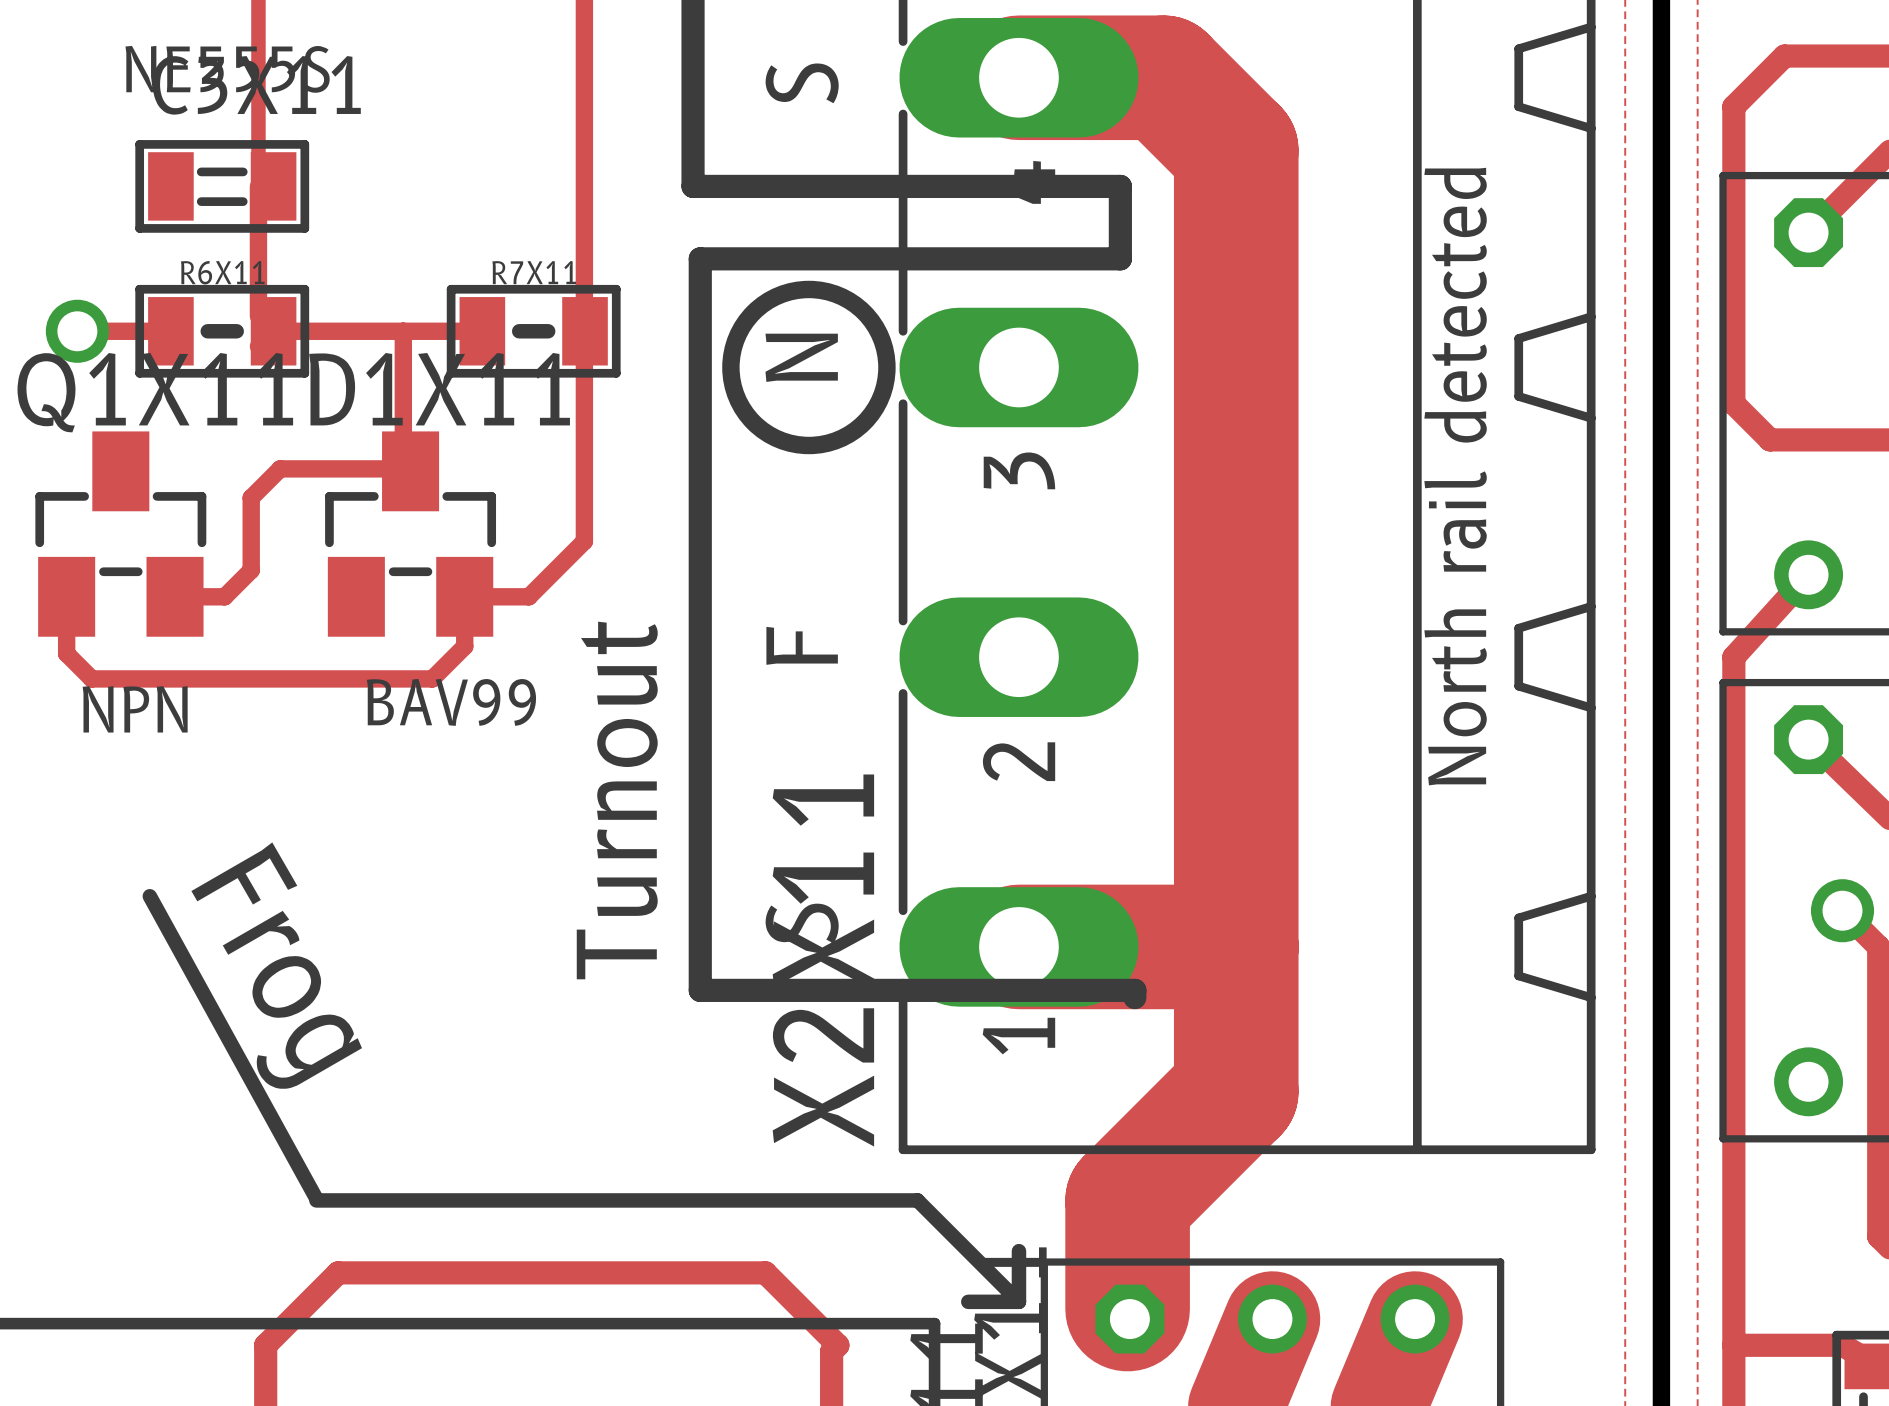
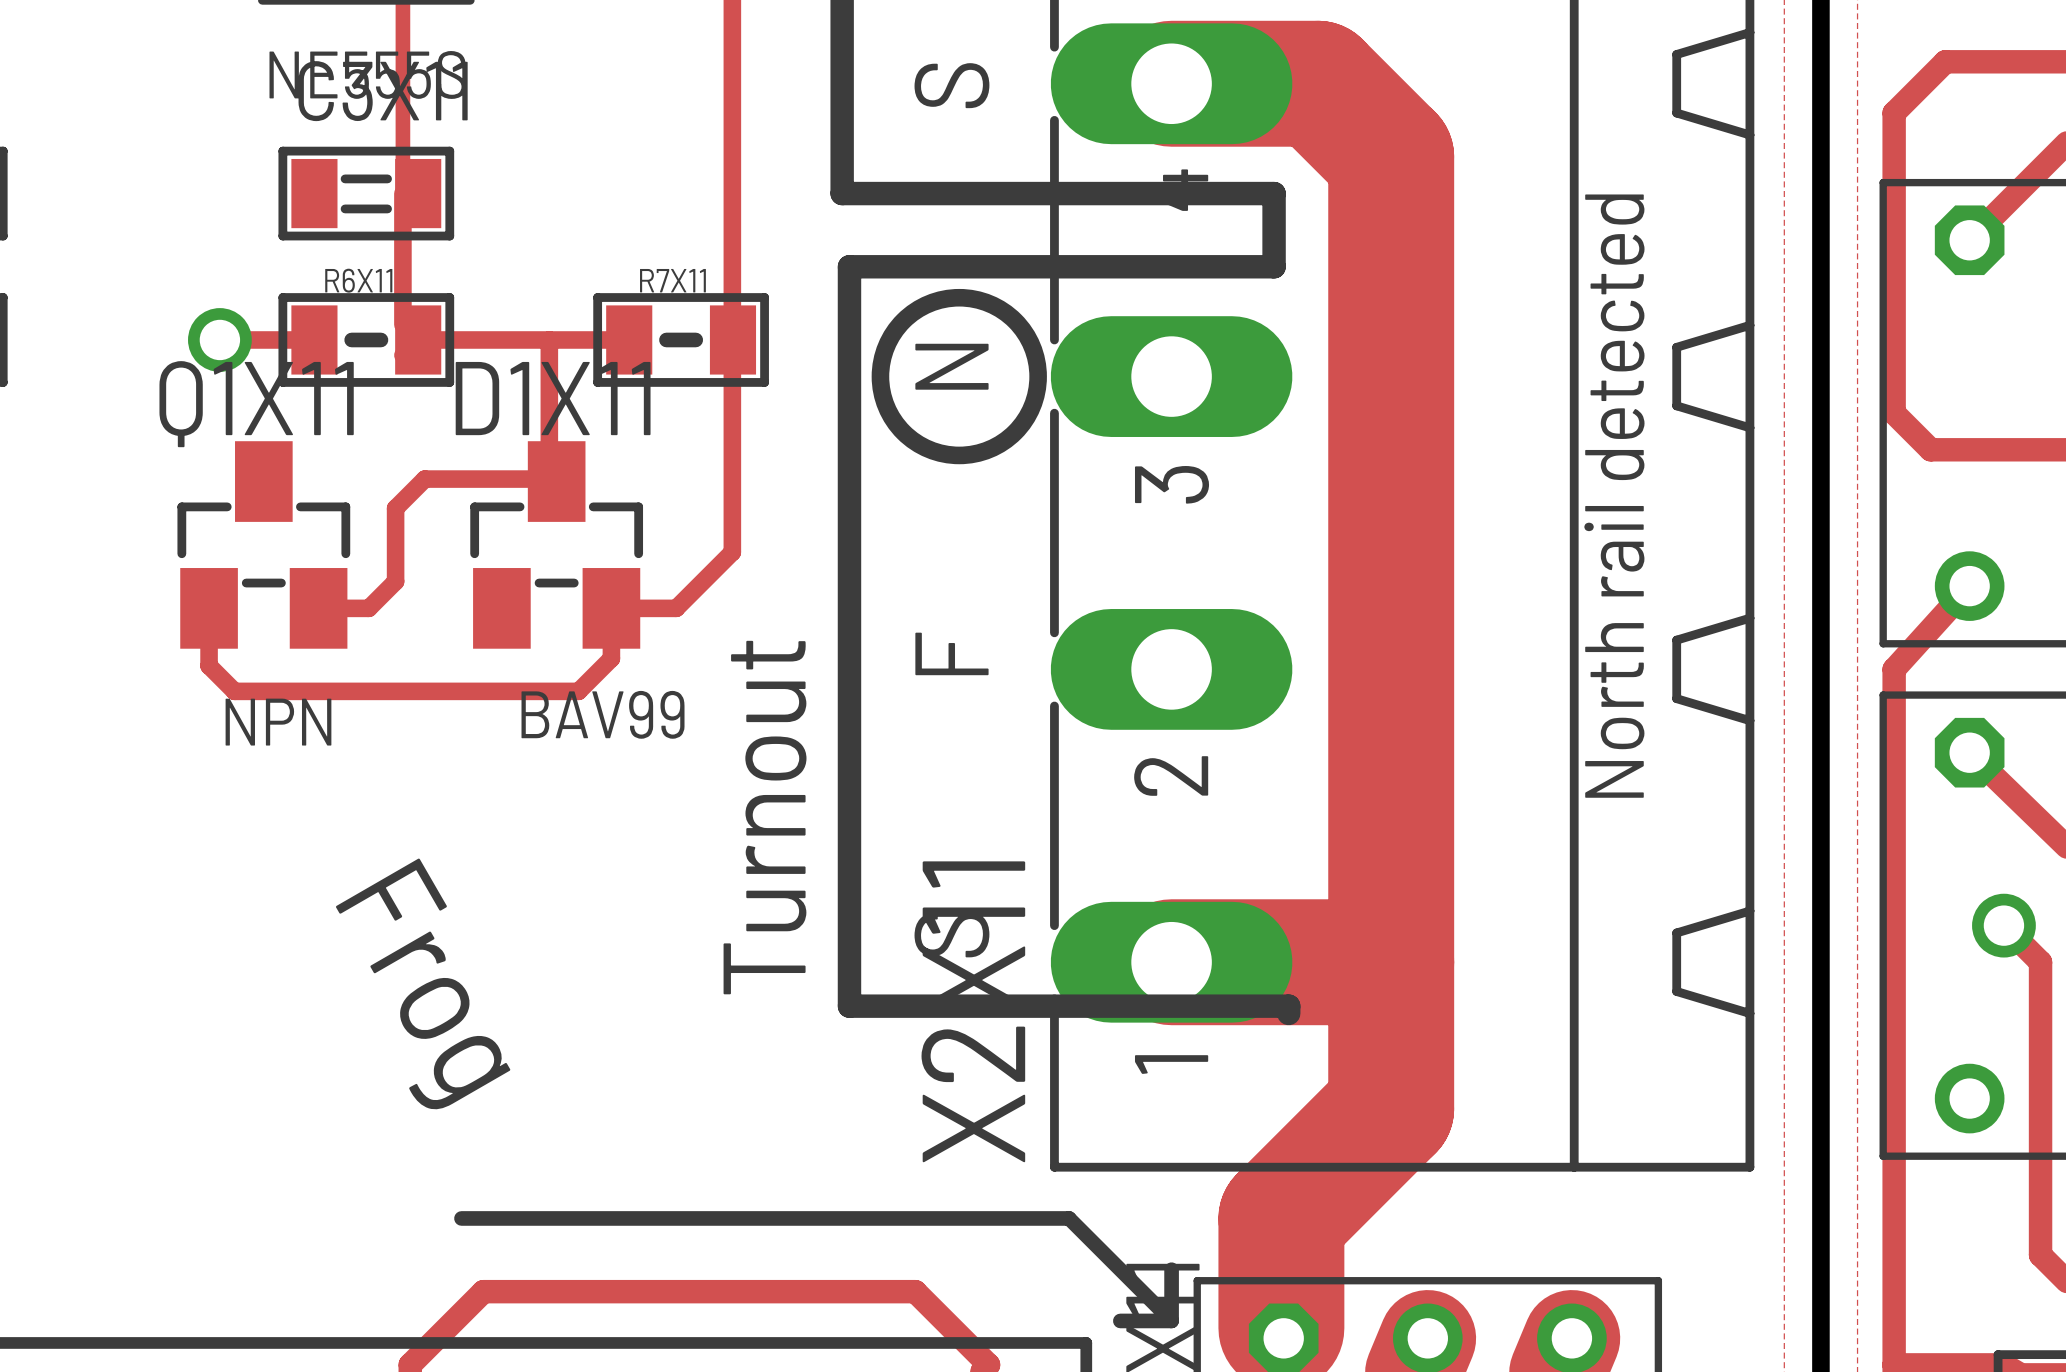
line: (149, 896) (314, 1196) -> none

